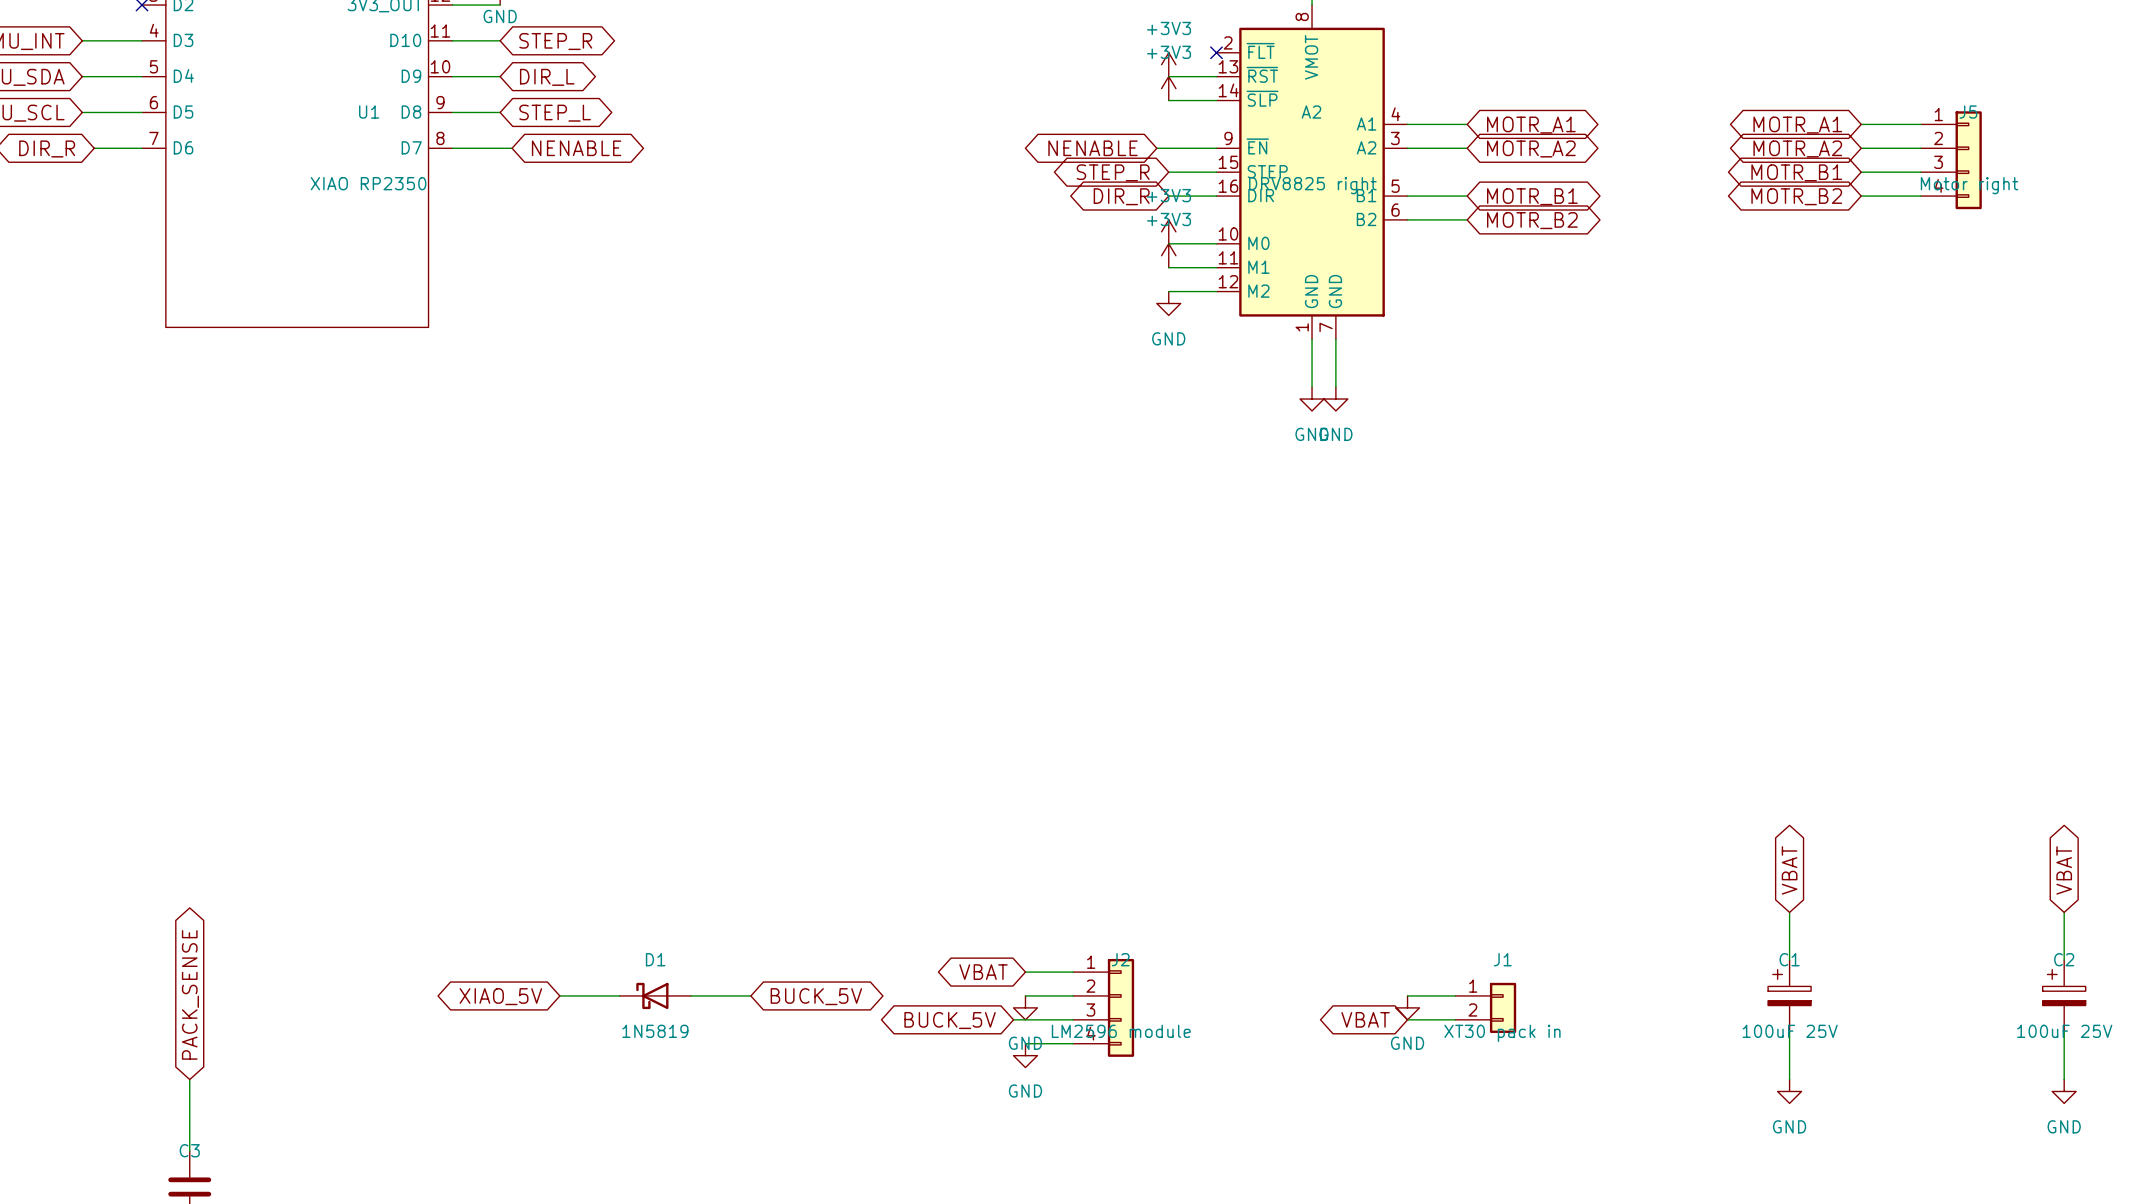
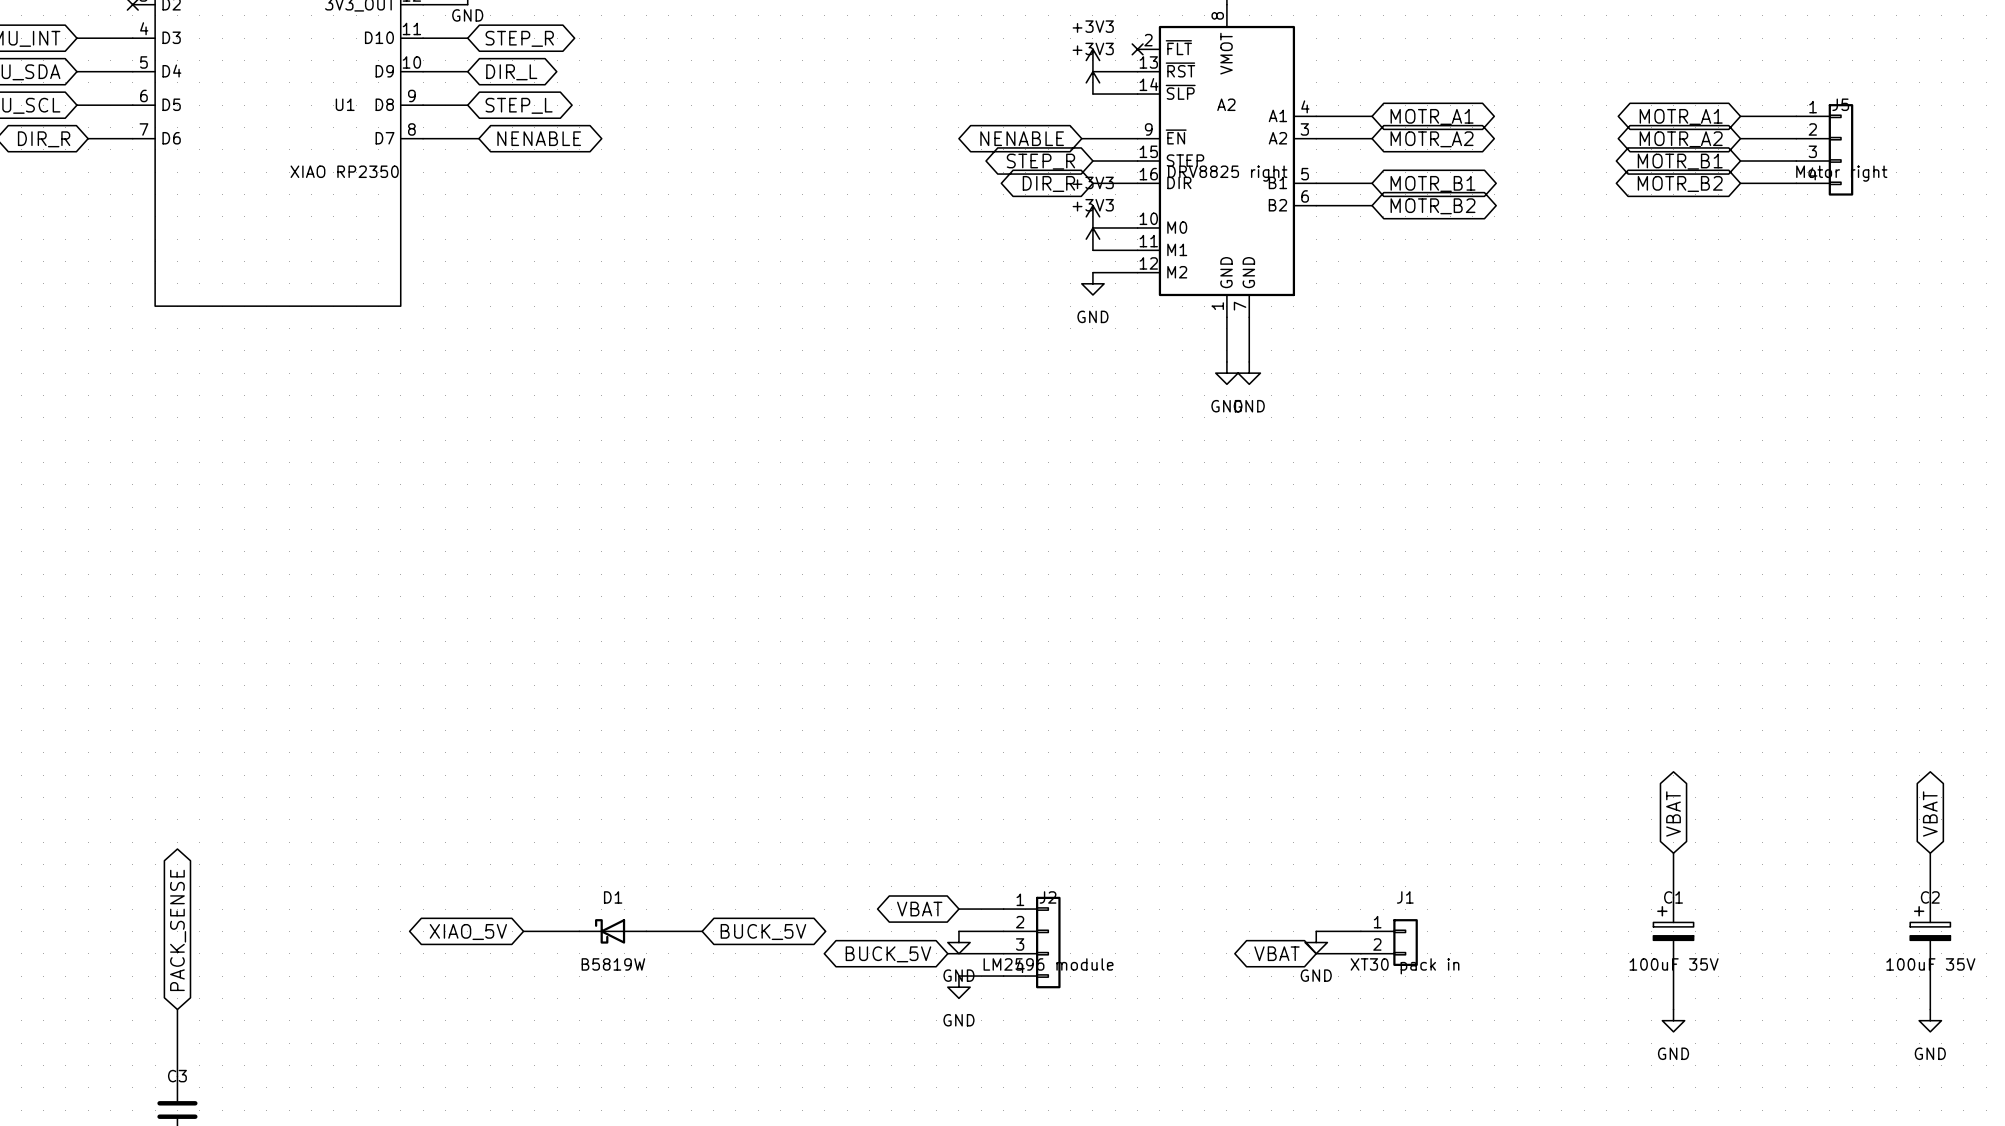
D1 value: 1N5819 (655, 1031) -> B5819W (613, 964)
C1 value: 100uF 25V (1790, 1031) -> 100uF 35V (1674, 964)
C2 value: 100uF 25V (2064, 1031) -> 100uF 35V (1930, 964)

